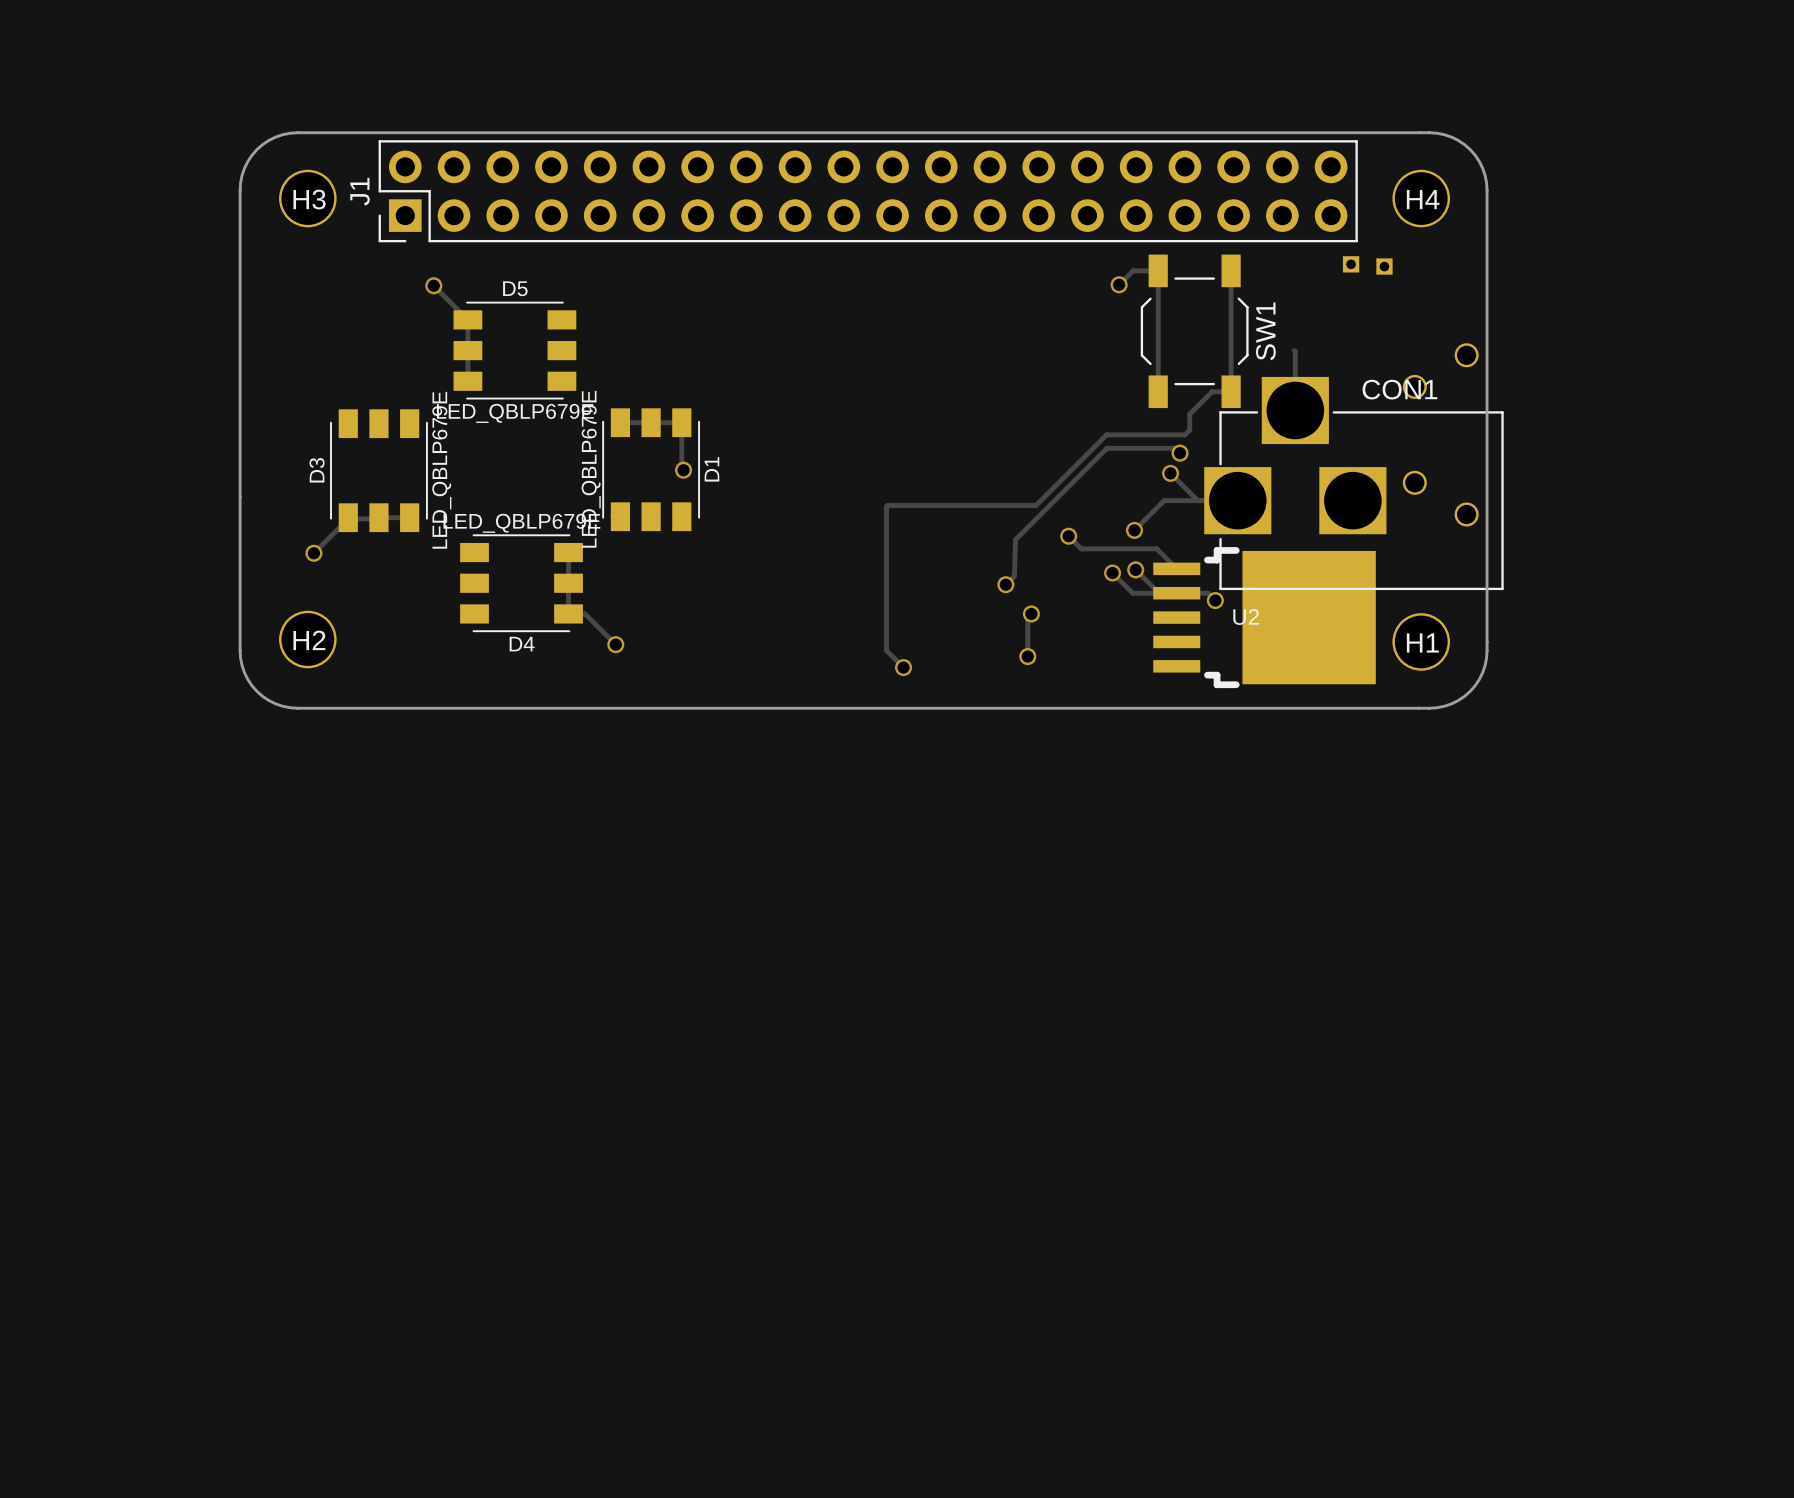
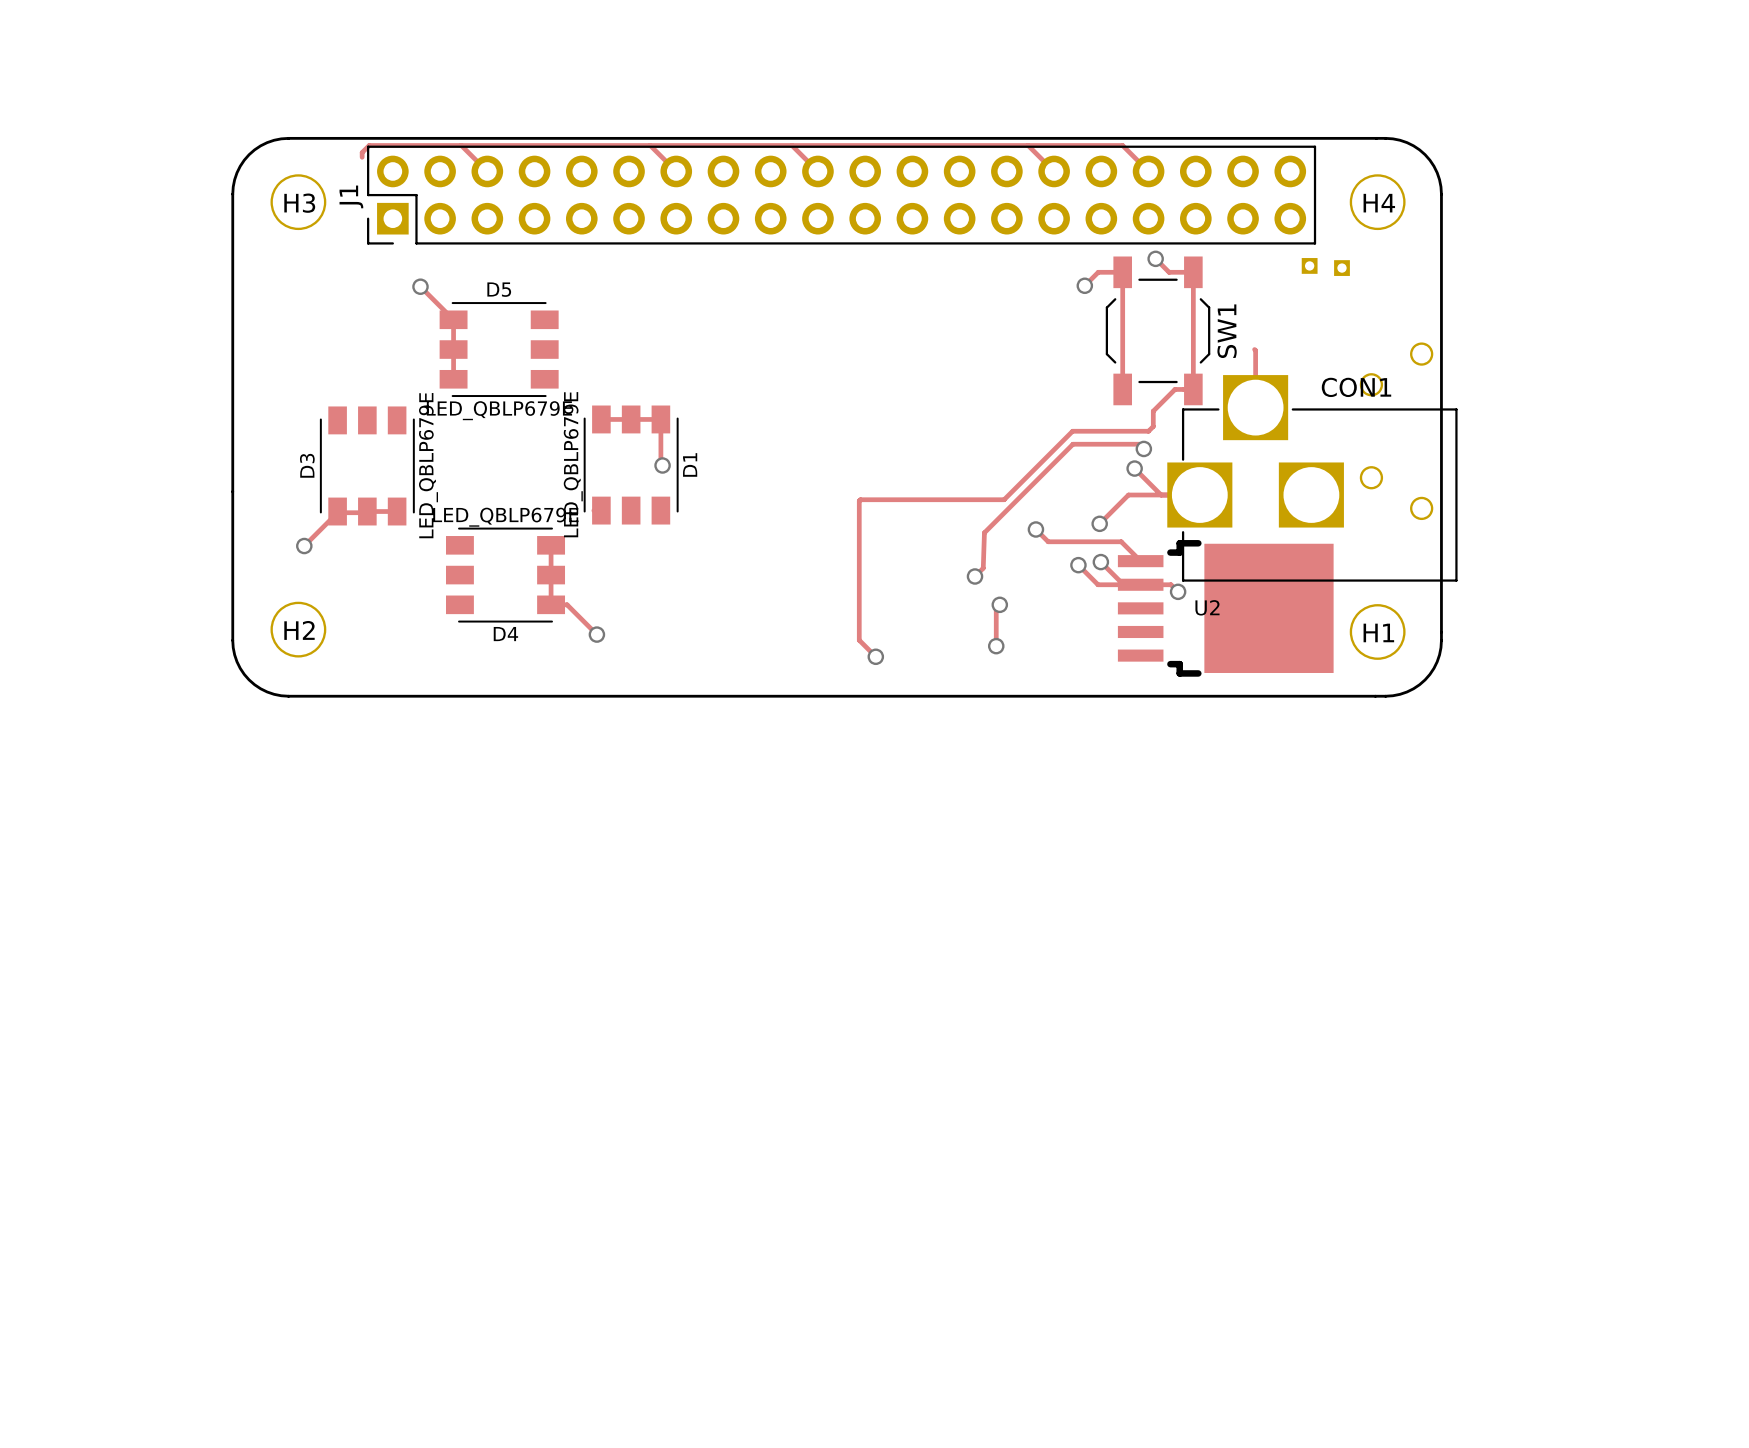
track: none -> (461, 145) (487, 171)
track: none -> (650, 145) (676, 171)
track: none -> (791, 145) (817, 171)
track: none -> (1028, 145) (1054, 171)
track: none -> (362, 157) (362, 152) (369, 145) (1122, 145) (1148, 171)
track: none -> (1155, 258) (1169, 272) (1193, 272)
via: none -> (1155, 258)

